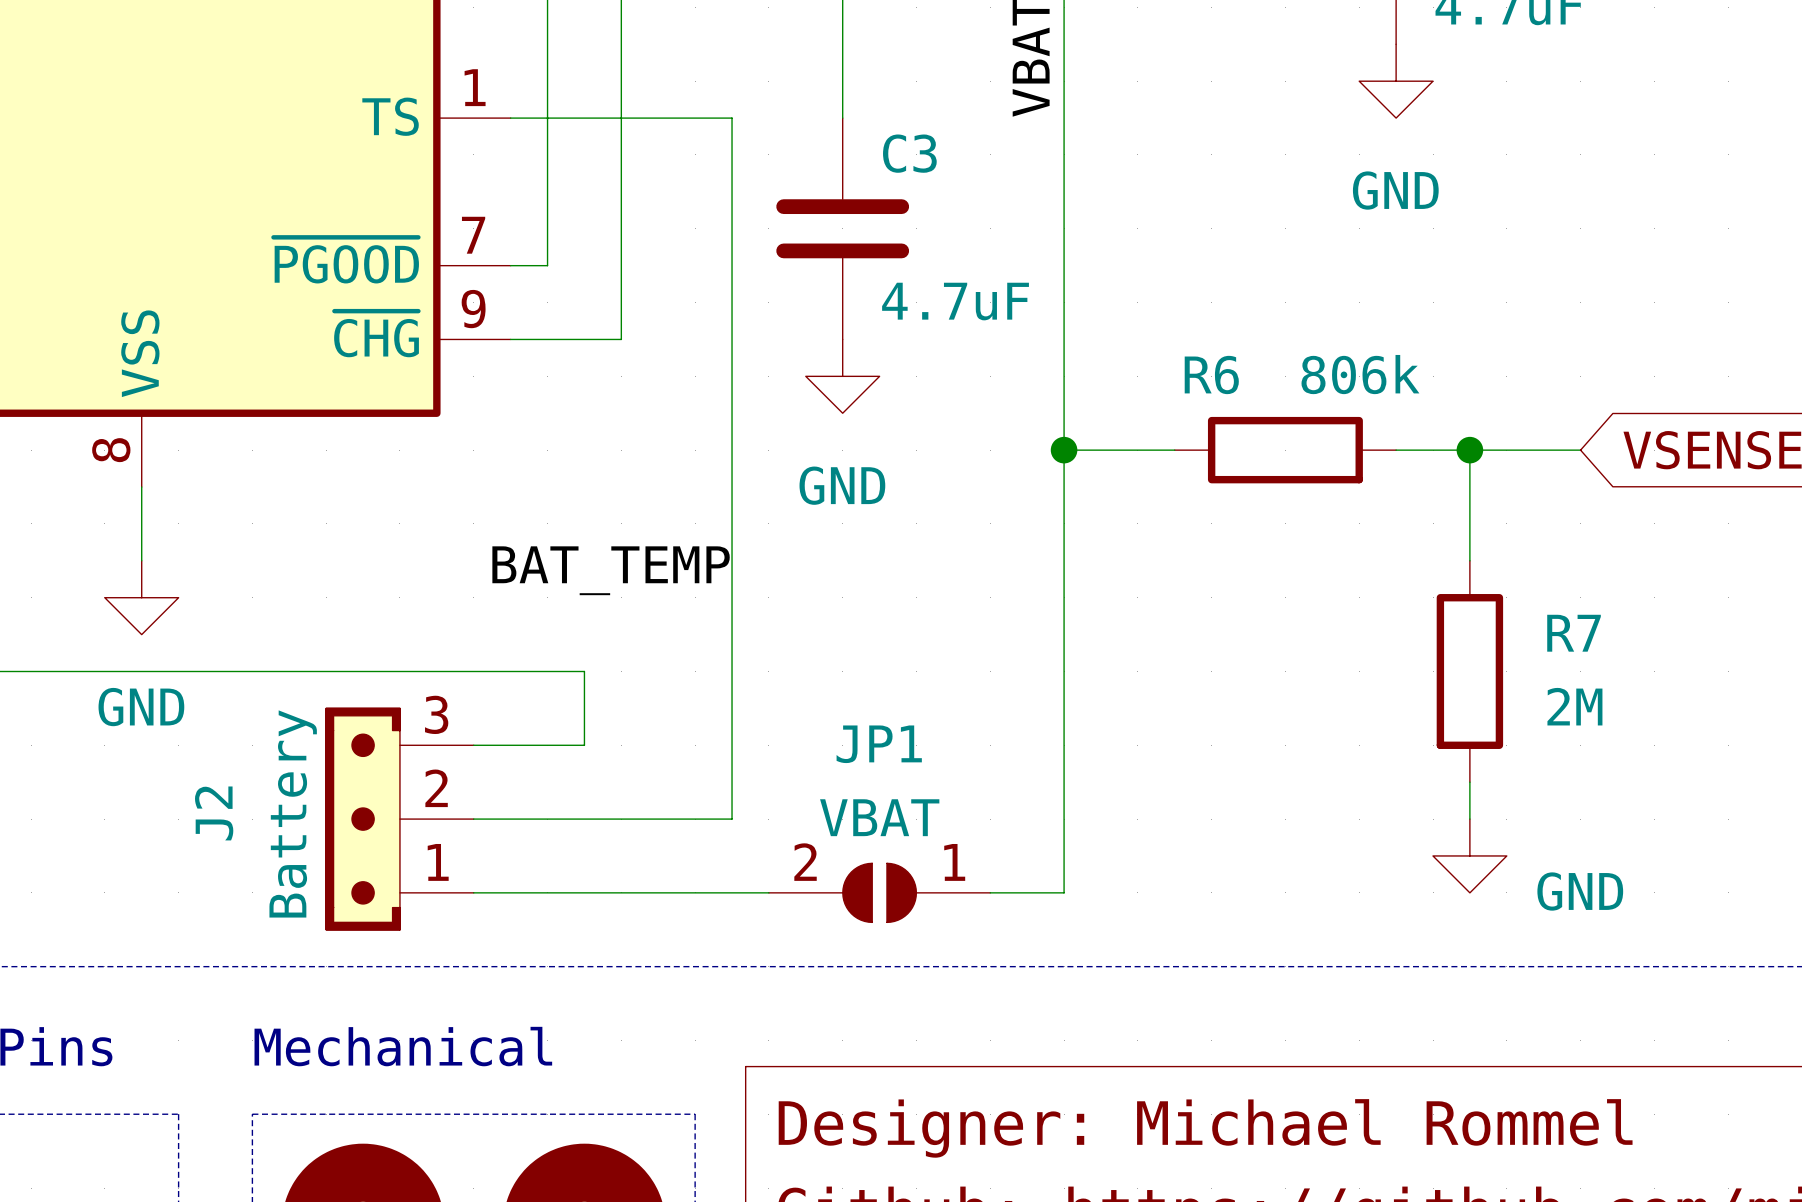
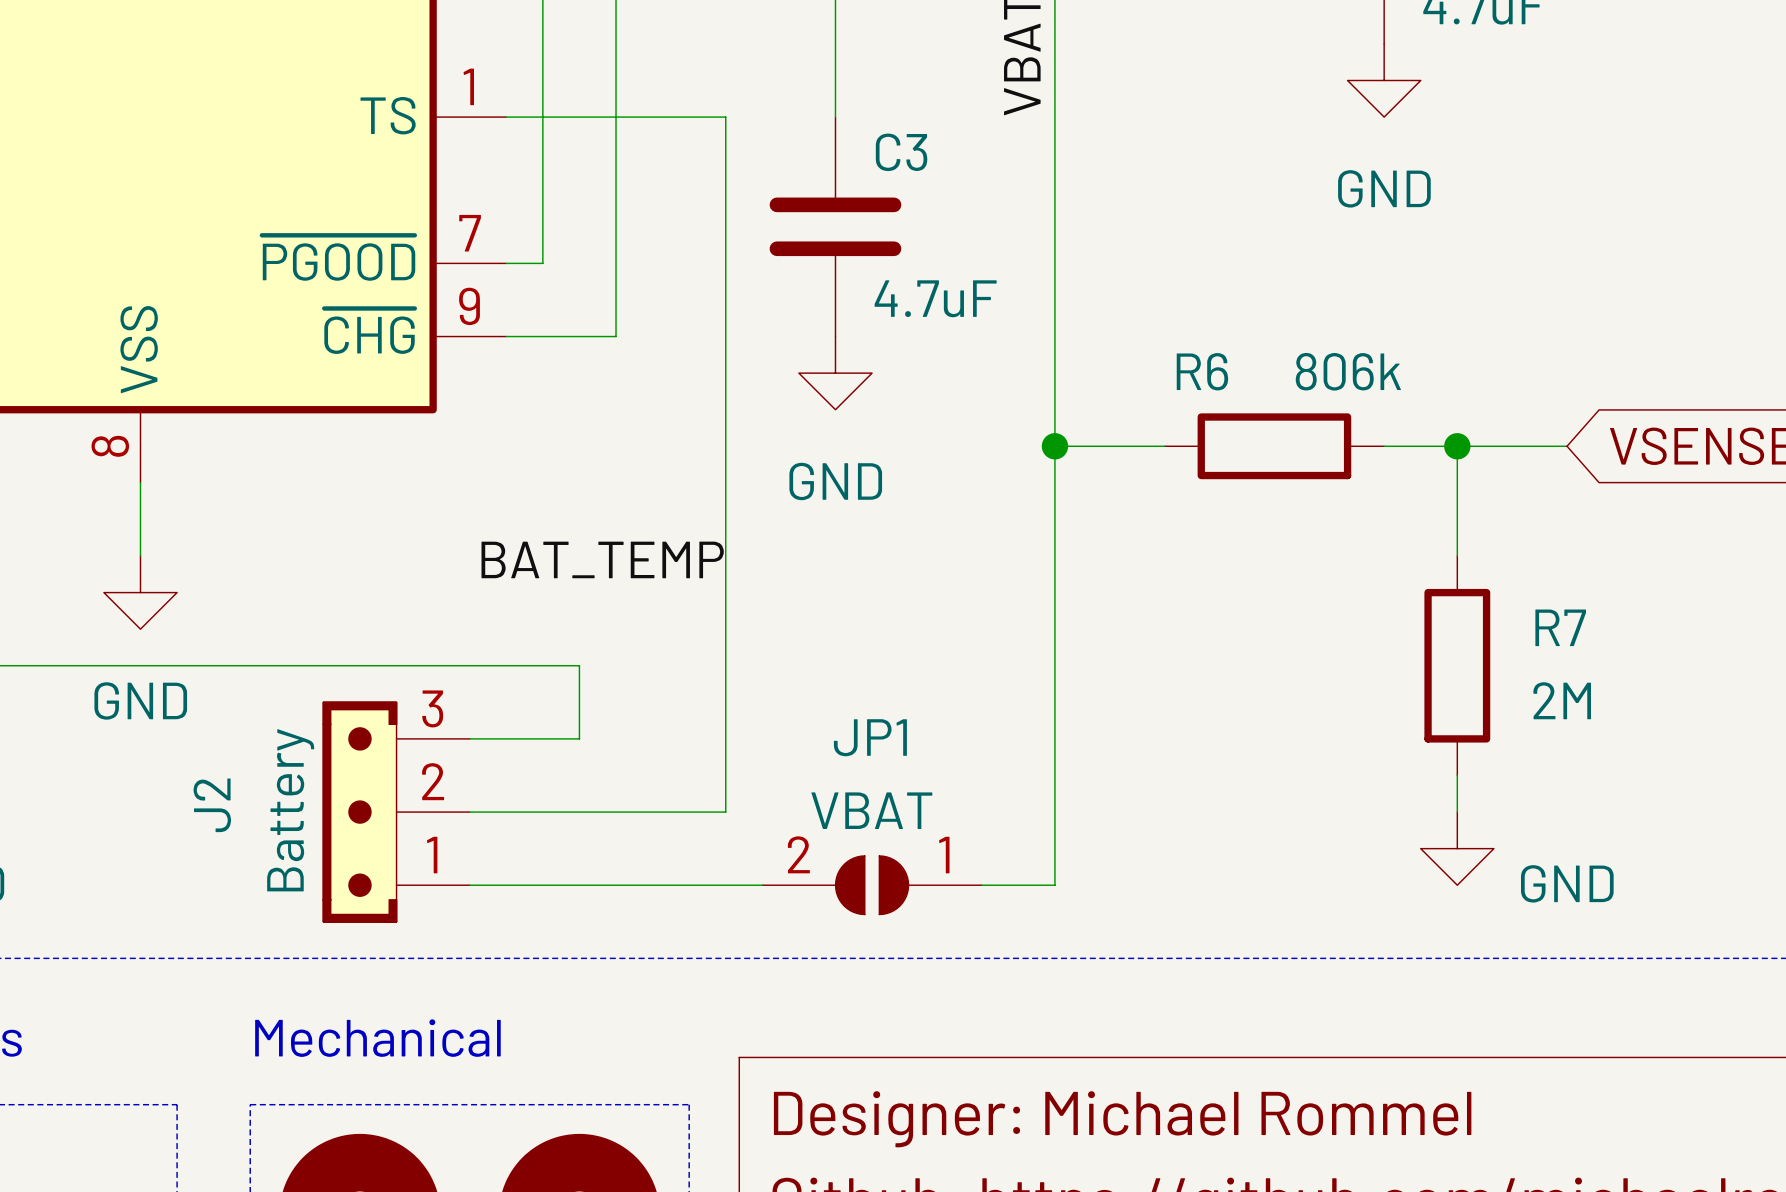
J2 value position: Battery (293, 813) -> Battery (290, 810)

